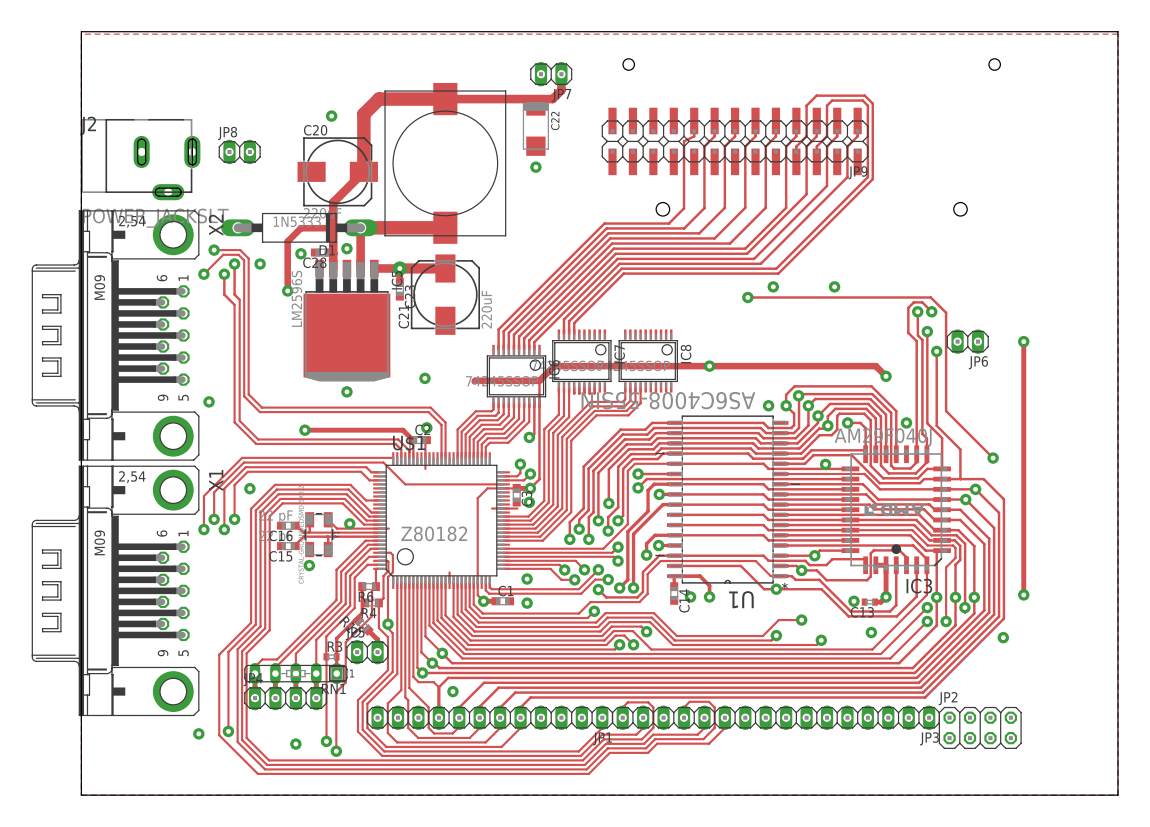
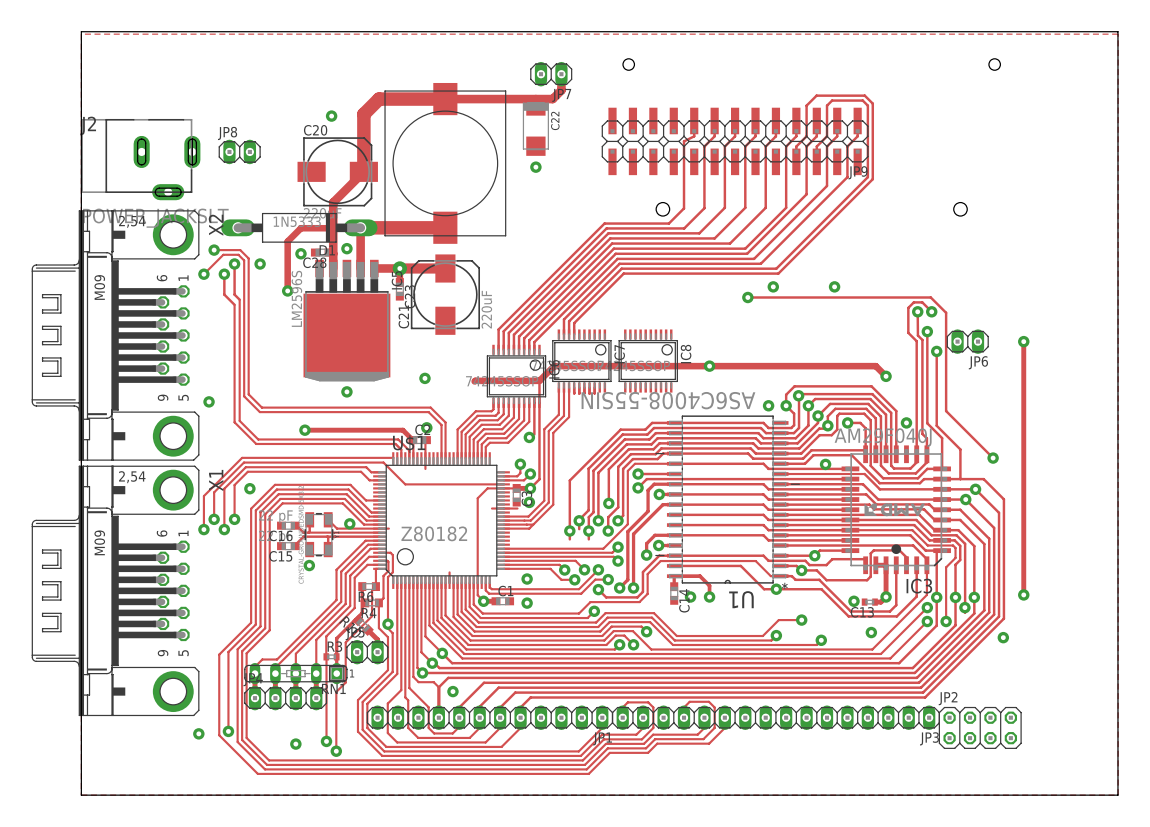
track: (625, 387) (625, 399) (622, 401) (590, 401) (557, 434) (557, 506) (535, 528) (529, 528) -> (533, 524) (529, 528)
track: (630, 387) (630, 400) (624, 406) (592, 406) (562, 437) (562, 508) (537, 532) (503, 532) -> none
track: (635, 387) (635, 401) (626, 410) (594, 410) (566, 438) (566, 510) (540, 536) (503, 536) -> none
track: (640, 387) (640, 403) (628, 415) (596, 415) (571, 440) (571, 512) (542, 540) (503, 540) -> none
track: (583, 466) (583, 508) (569, 522) -> (583, 466) (569, 480) (569, 522)
via: none -> (579, 520)
via: (579, 529) -> none
via: none -> (569, 531)
via: none -> (588, 531)
via: (569, 539) -> none
via: (588, 539) -> none

